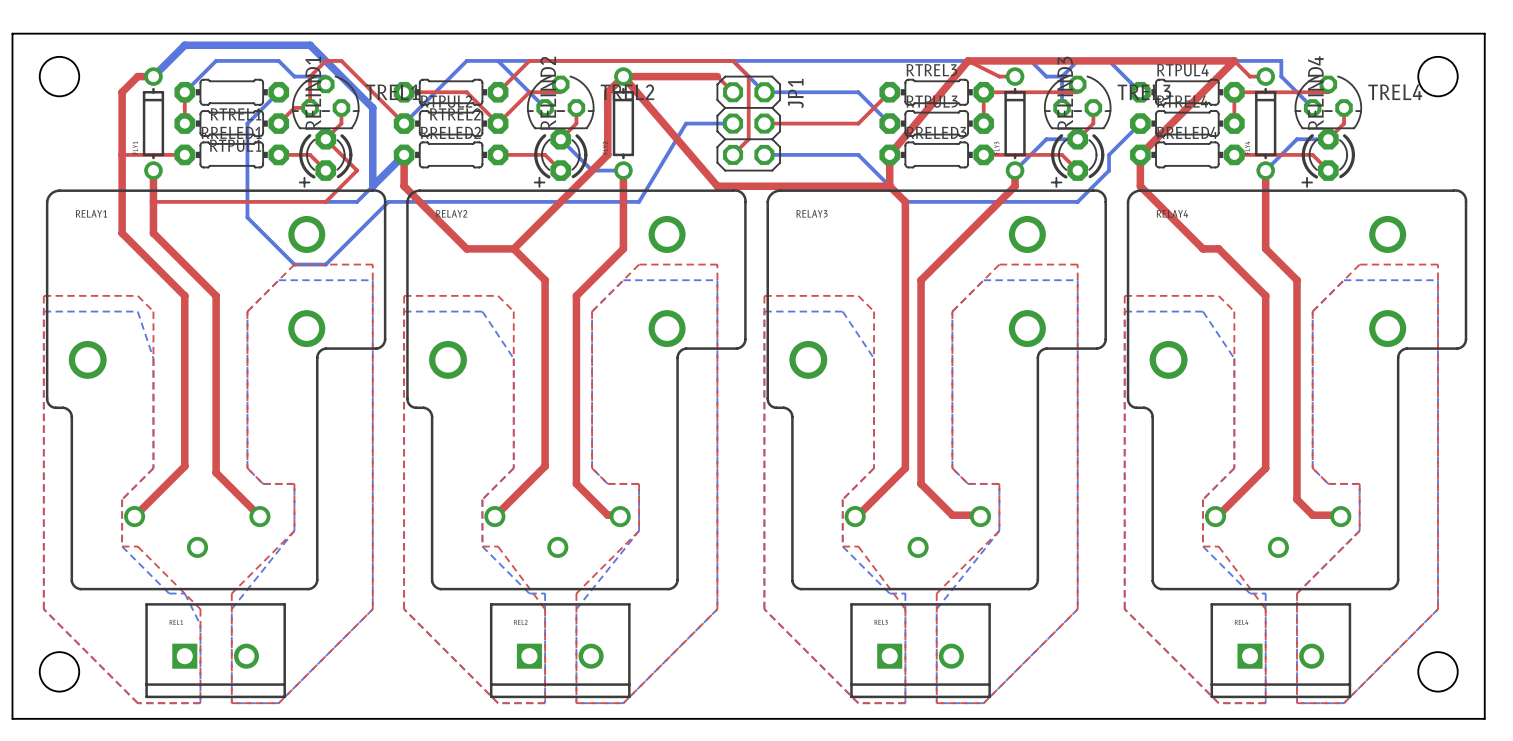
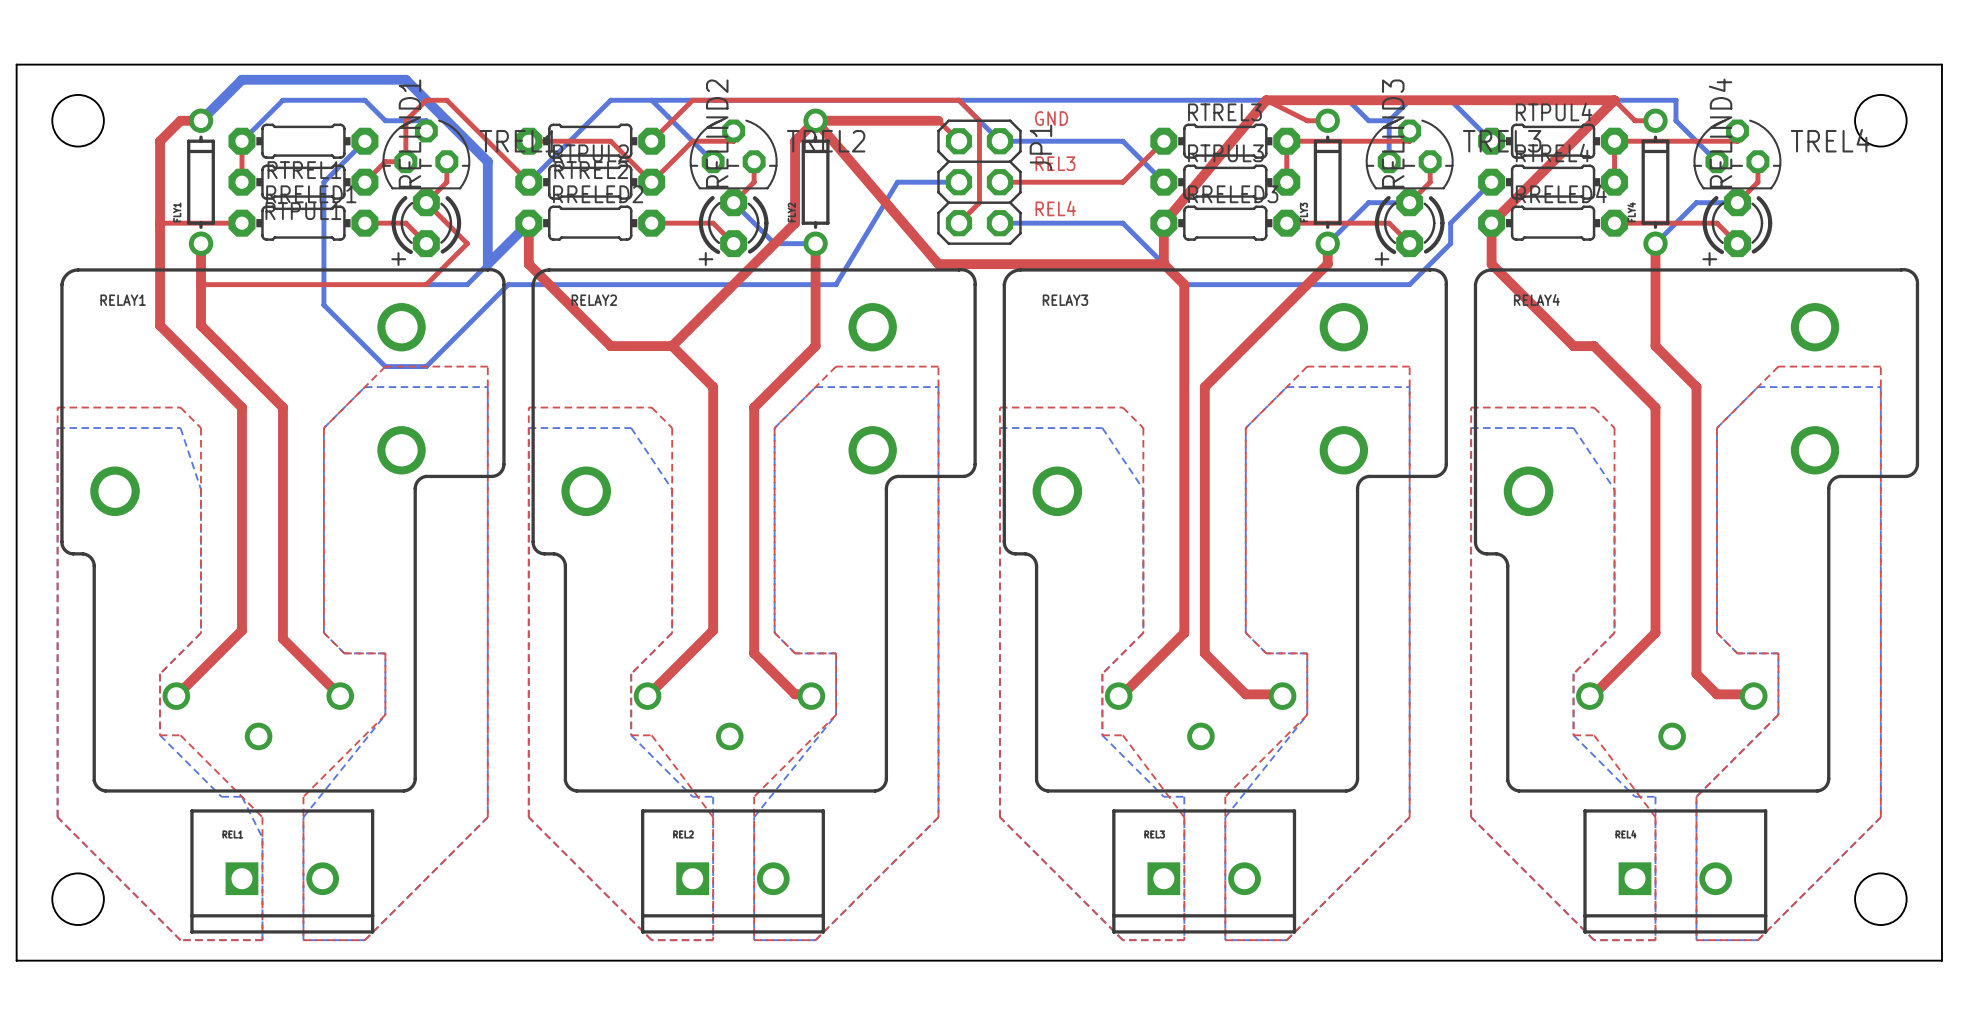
text: none -> GND (1051, 118)
text: none -> REL3 (1055, 163)
text: none -> REL4 (1055, 208)

